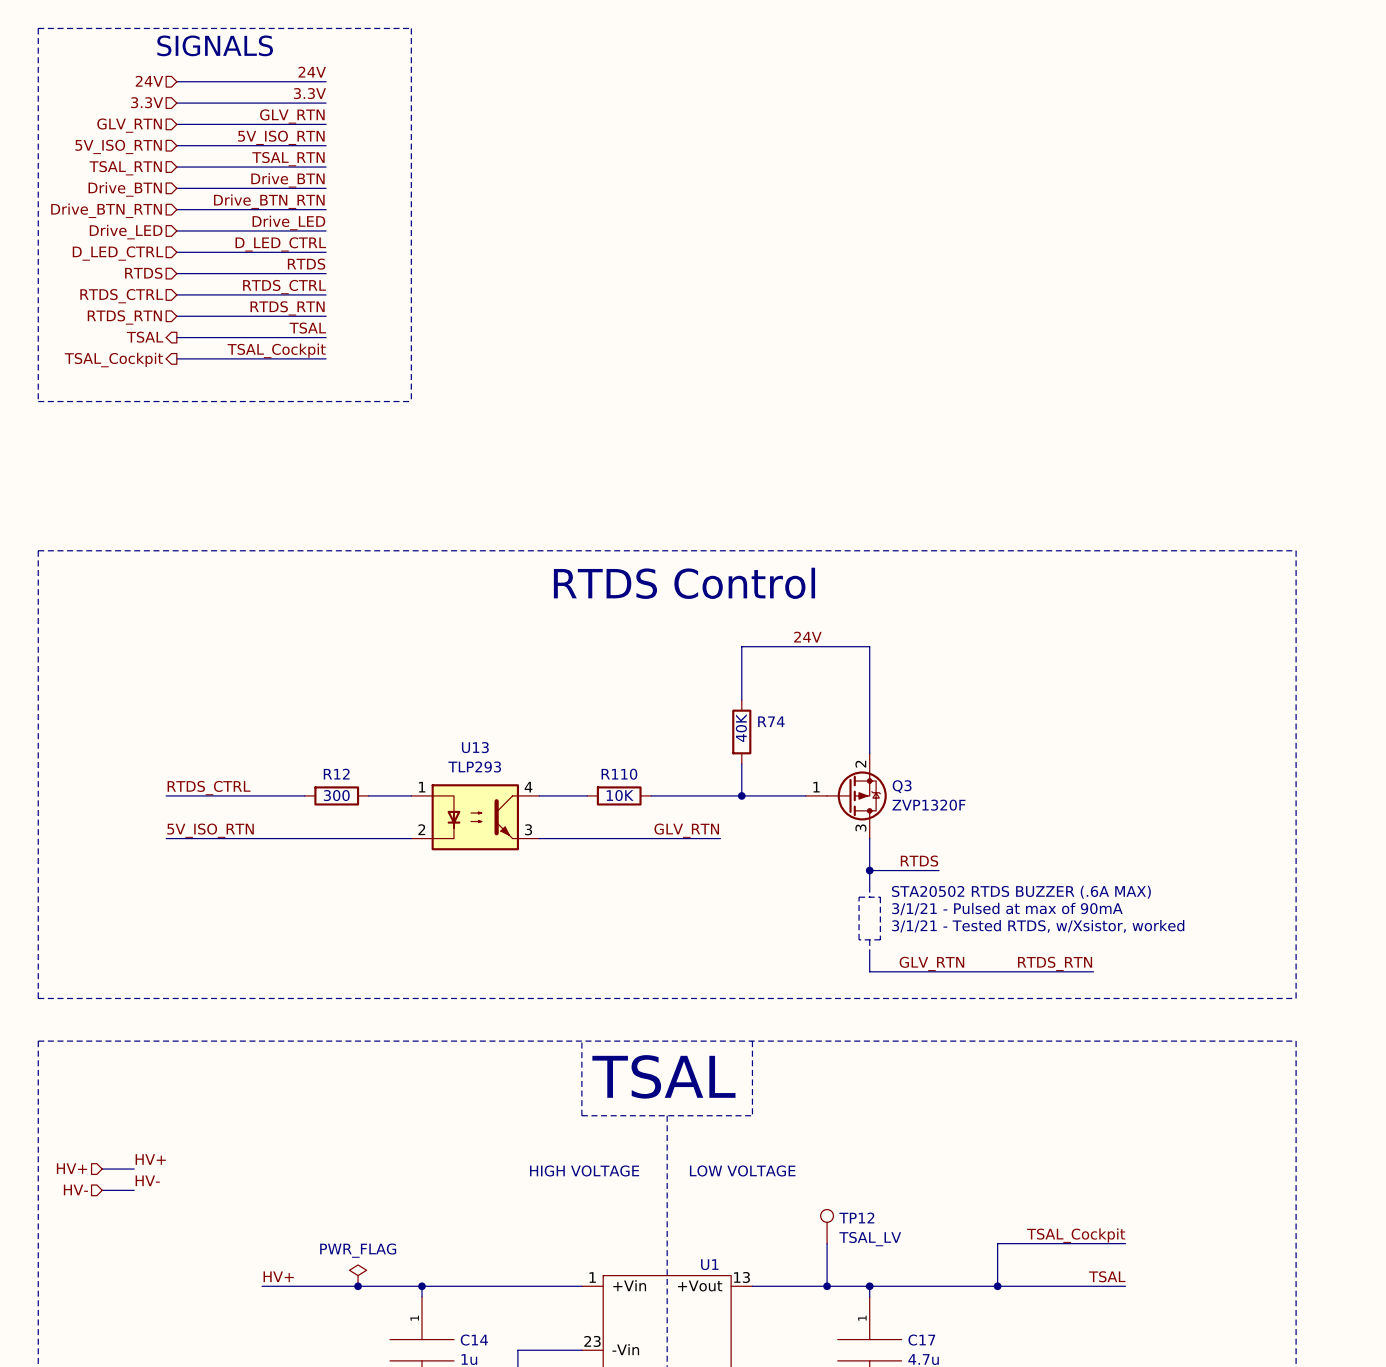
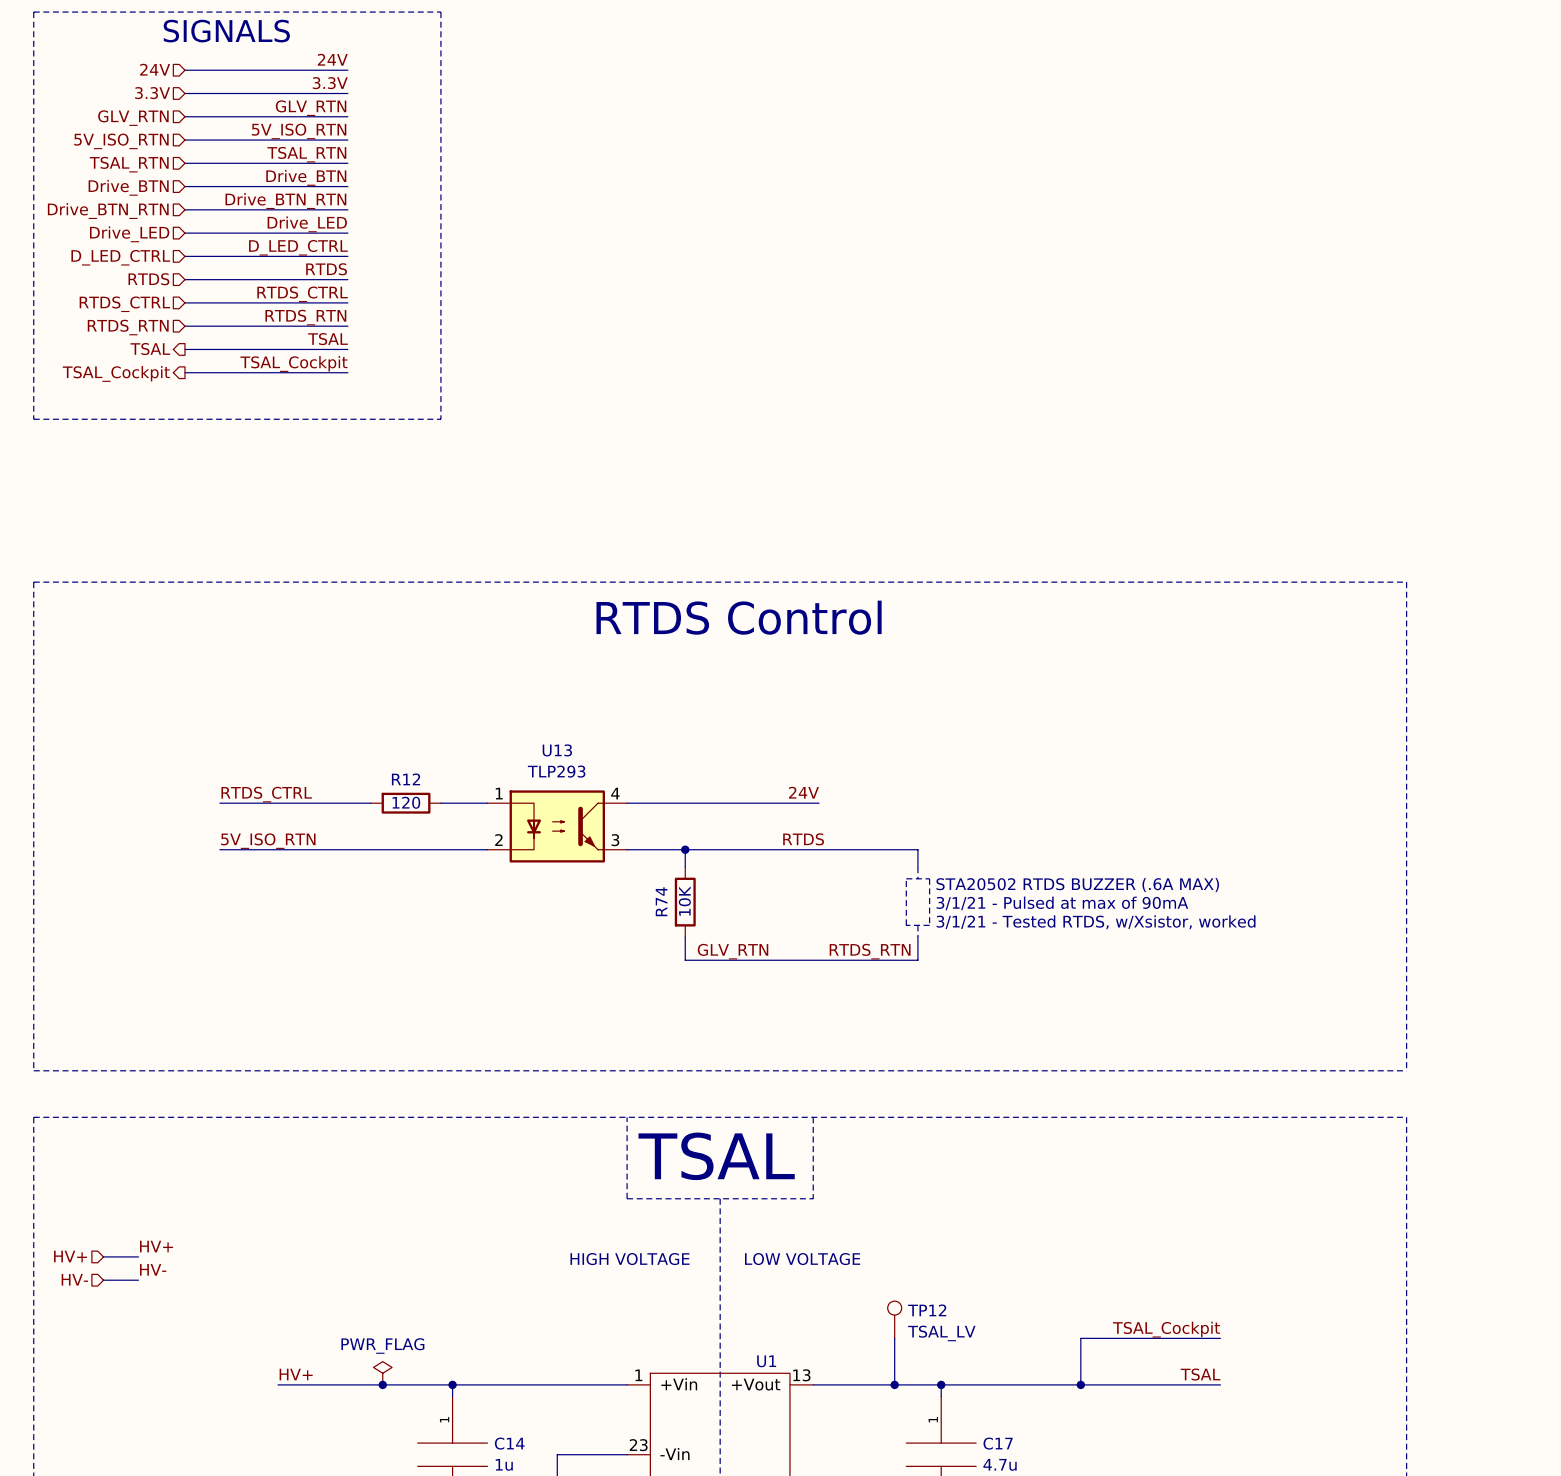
label position: 24V (807, 637) -> 24V (803, 792)
wire: (741, 700) (741, 646) (869, 646) (869, 753) -> none
R74 name rotation: 0° (771, 721) -> 90° counterclockwise (661, 901)
R74 name position: R74 (771, 721) -> R74 (661, 901)
R74 value: 40K (741, 728) -> 10K (684, 901)
R74 position: (741, 731) -> (685, 902)
wire: none -> (219, 803) (371, 803)
wire: none -> (440, 803) (487, 803)
wire: none -> (627, 803) (819, 803)
wire: (741, 763) (741, 795) -> none
label position: RTDS_CTRL (209, 788) -> RTDS_CTRL (266, 794)
wire: (166, 795) (208, 795) -> none
wire: none -> (324, 849) (394, 849)
R12 position: (336, 795) -> (406, 803)
R12 value: 300 (336, 795) -> 120 (406, 802)
wire: none -> (632, 849) (702, 849)
R110: 10K (619, 795) -> none
wire: none -> (685, 849) (685, 867)
junction: none -> (685, 849)
junction: (741, 795) -> none
Q3: ZVP1320F (846, 795) -> none
U13 position: (475, 817) -> (557, 826)
label position: 5V_ISO_RTN (210, 830) -> 5V_ISO_RTN (268, 841)
label position: GLV_RTN (686, 830) -> GLV_RTN (733, 951)
wire: (166, 838) (411, 838) -> none
wire: (539, 838) (720, 838) -> none
wire: (869, 838) (869, 886) -> none
label position: RTDS (919, 861) -> RTDS (803, 839)
wire: (869, 870) (938, 870) -> none
junction: (869, 870) -> none
wire: none -> (685, 936) (685, 960) (917, 960) (917, 936)
line: (869, 886) (869, 897) -> (917, 867) (917, 878)
label: none -> RTDS_RTN (870, 951)
text position: STA20502 RTDS BUZZER (.6A MAX) (1021, 892) -> STA20502 RTDS BUZZER (.6A MAX) (1077, 884)
line: (859, 897) (880, 897) (880, 939) (859, 939) (859, 897) -> (906, 878) (929, 878) (929, 925) (906, 925) (906, 878)
text position: 3/1/21 - Pulsed at max of 90mA (1007, 909) -> 3/1/21 - Pulsed at max of 90mA (1062, 903)
text position: 3/1/21 - Tested RTDS, w/Xsistor, worked (1038, 926) -> 3/1/21 - Tested RTDS, w/Xsistor, worked (1096, 922)
line: (869, 939) (869, 950) -> (917, 925) (917, 936)
wire: (869, 950) (869, 971) (1093, 971) -> none
label: GLV_RTN (931, 963) -> none
label: RTDS_RTN (1055, 963) -> none

